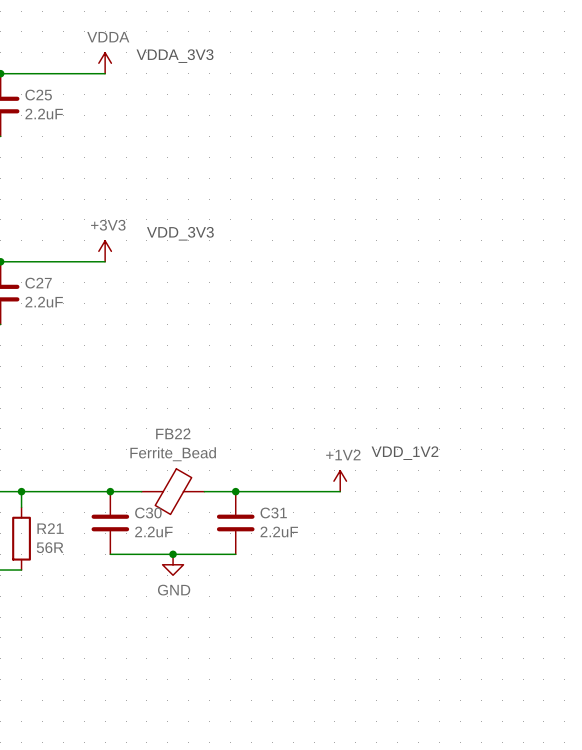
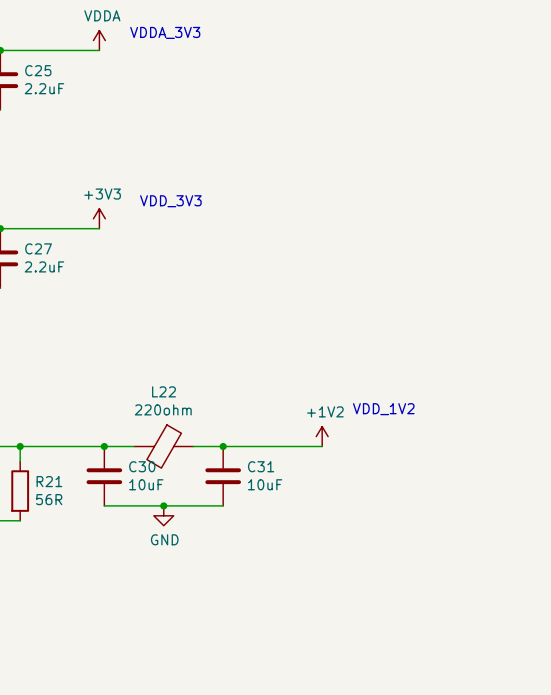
FB22 name: FB22 (173, 433) -> L22 (163, 391)
FB22 value: Ferrite_Bead (173, 454) -> 220ohm (163, 409)
C30 value: 2.2uF (153, 532) -> 10uF (146, 484)
C31 value: 2.2uF (279, 532) -> 10uF (265, 484)

